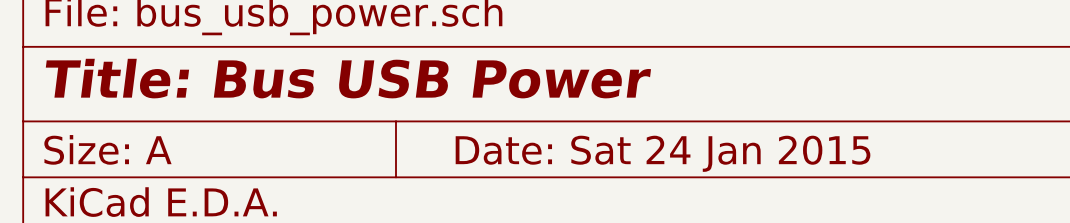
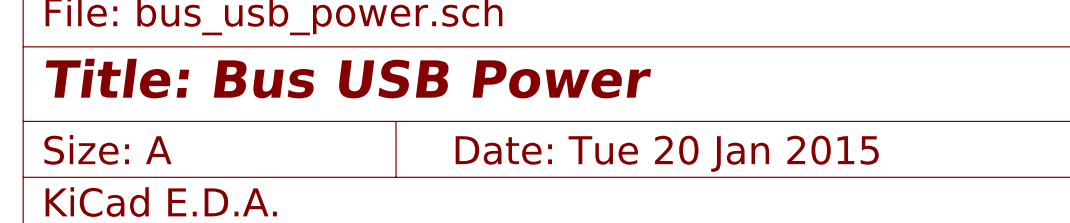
title block: Date: Sat 24 Jan 2015 (663, 153) -> Date: Tue 20 Jan 2015 (667, 153)

